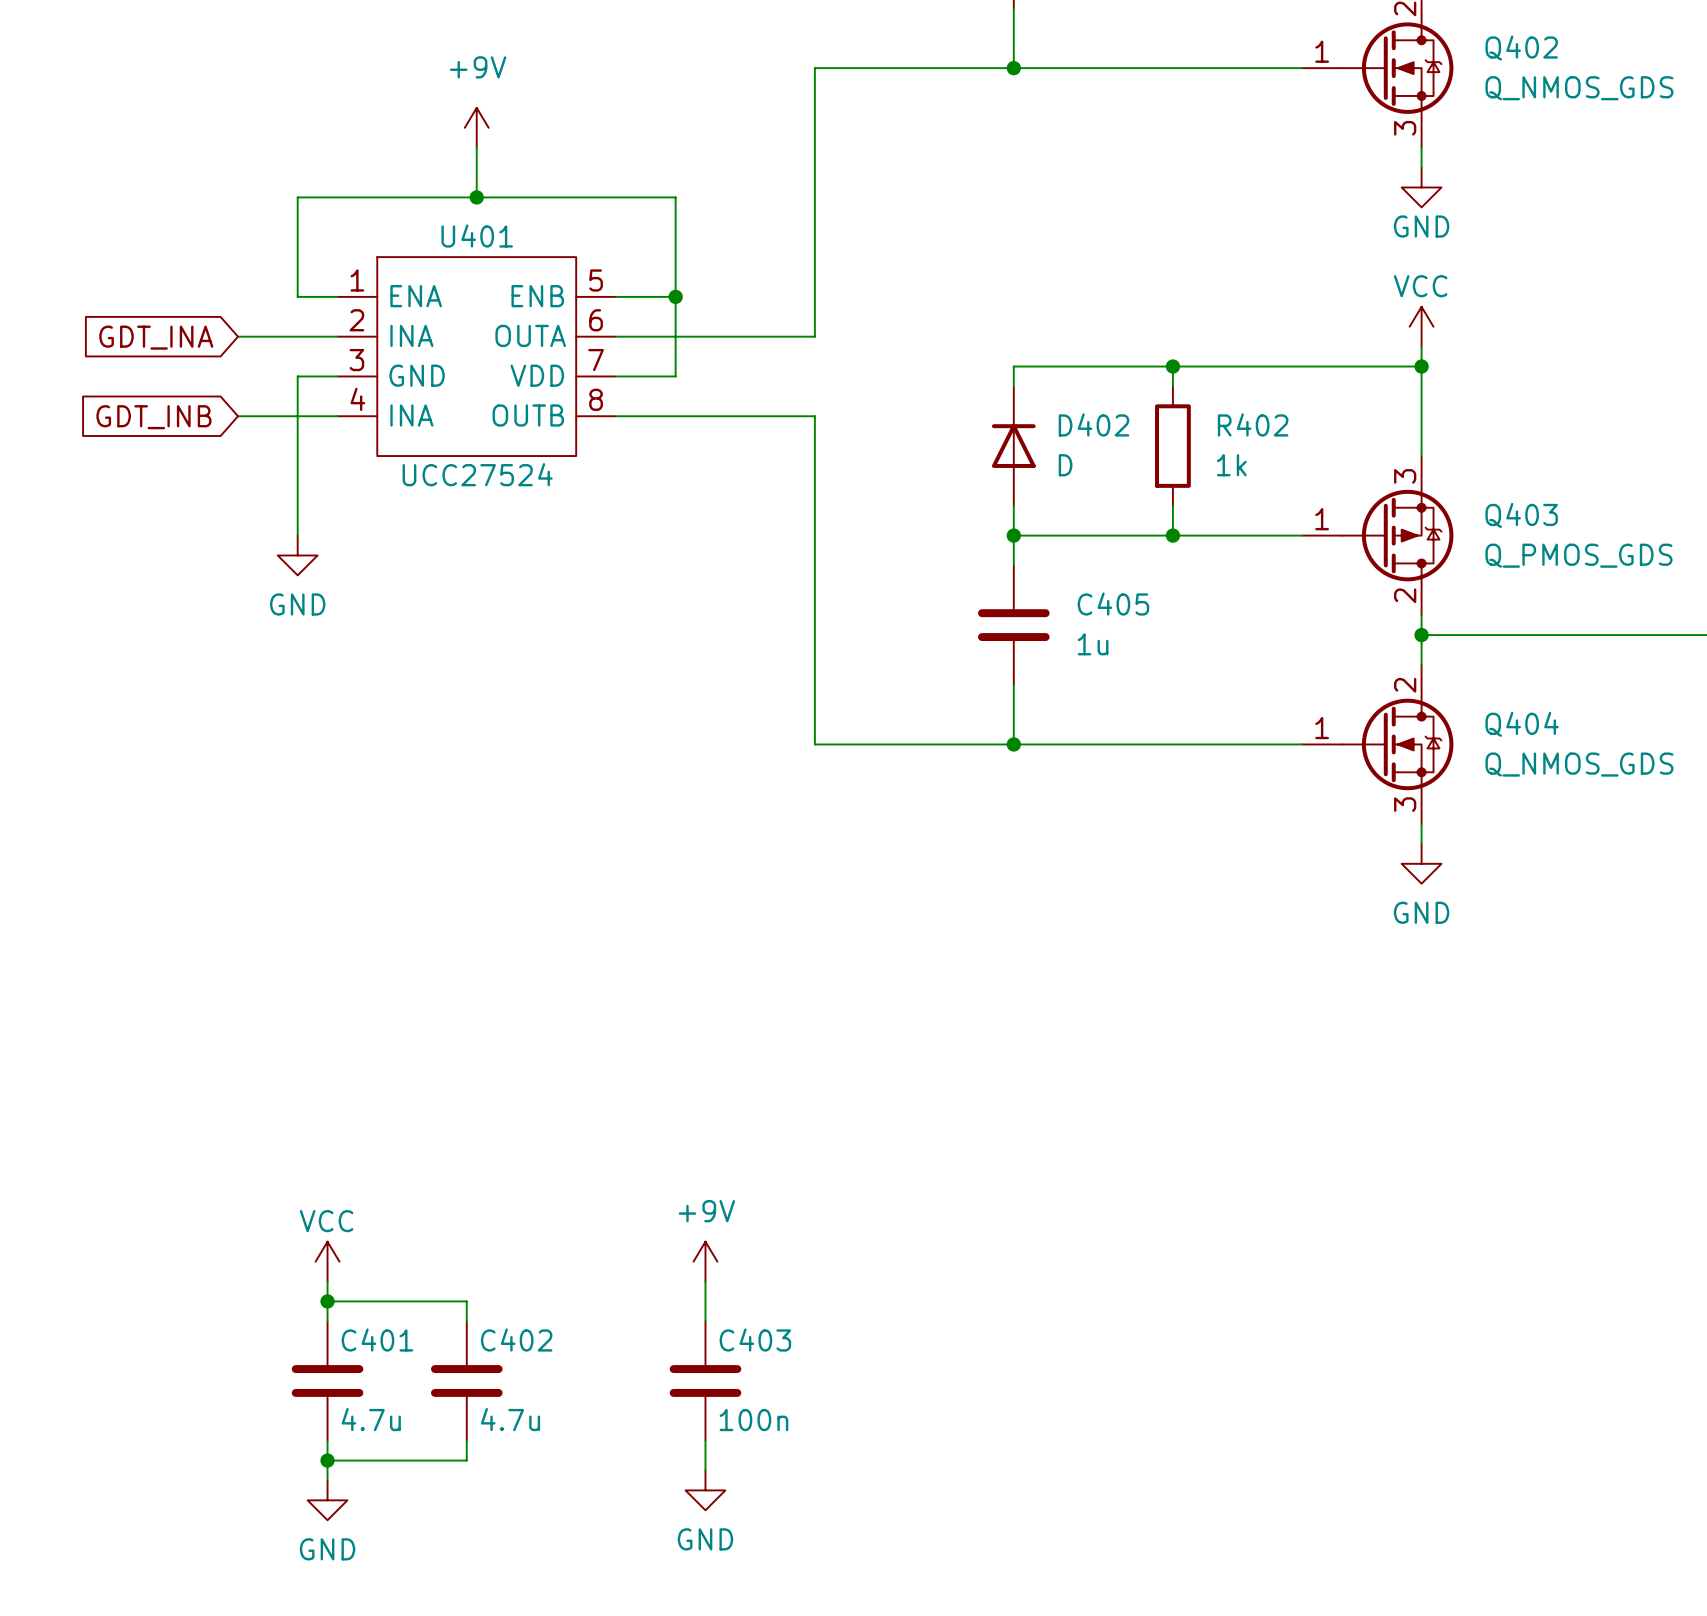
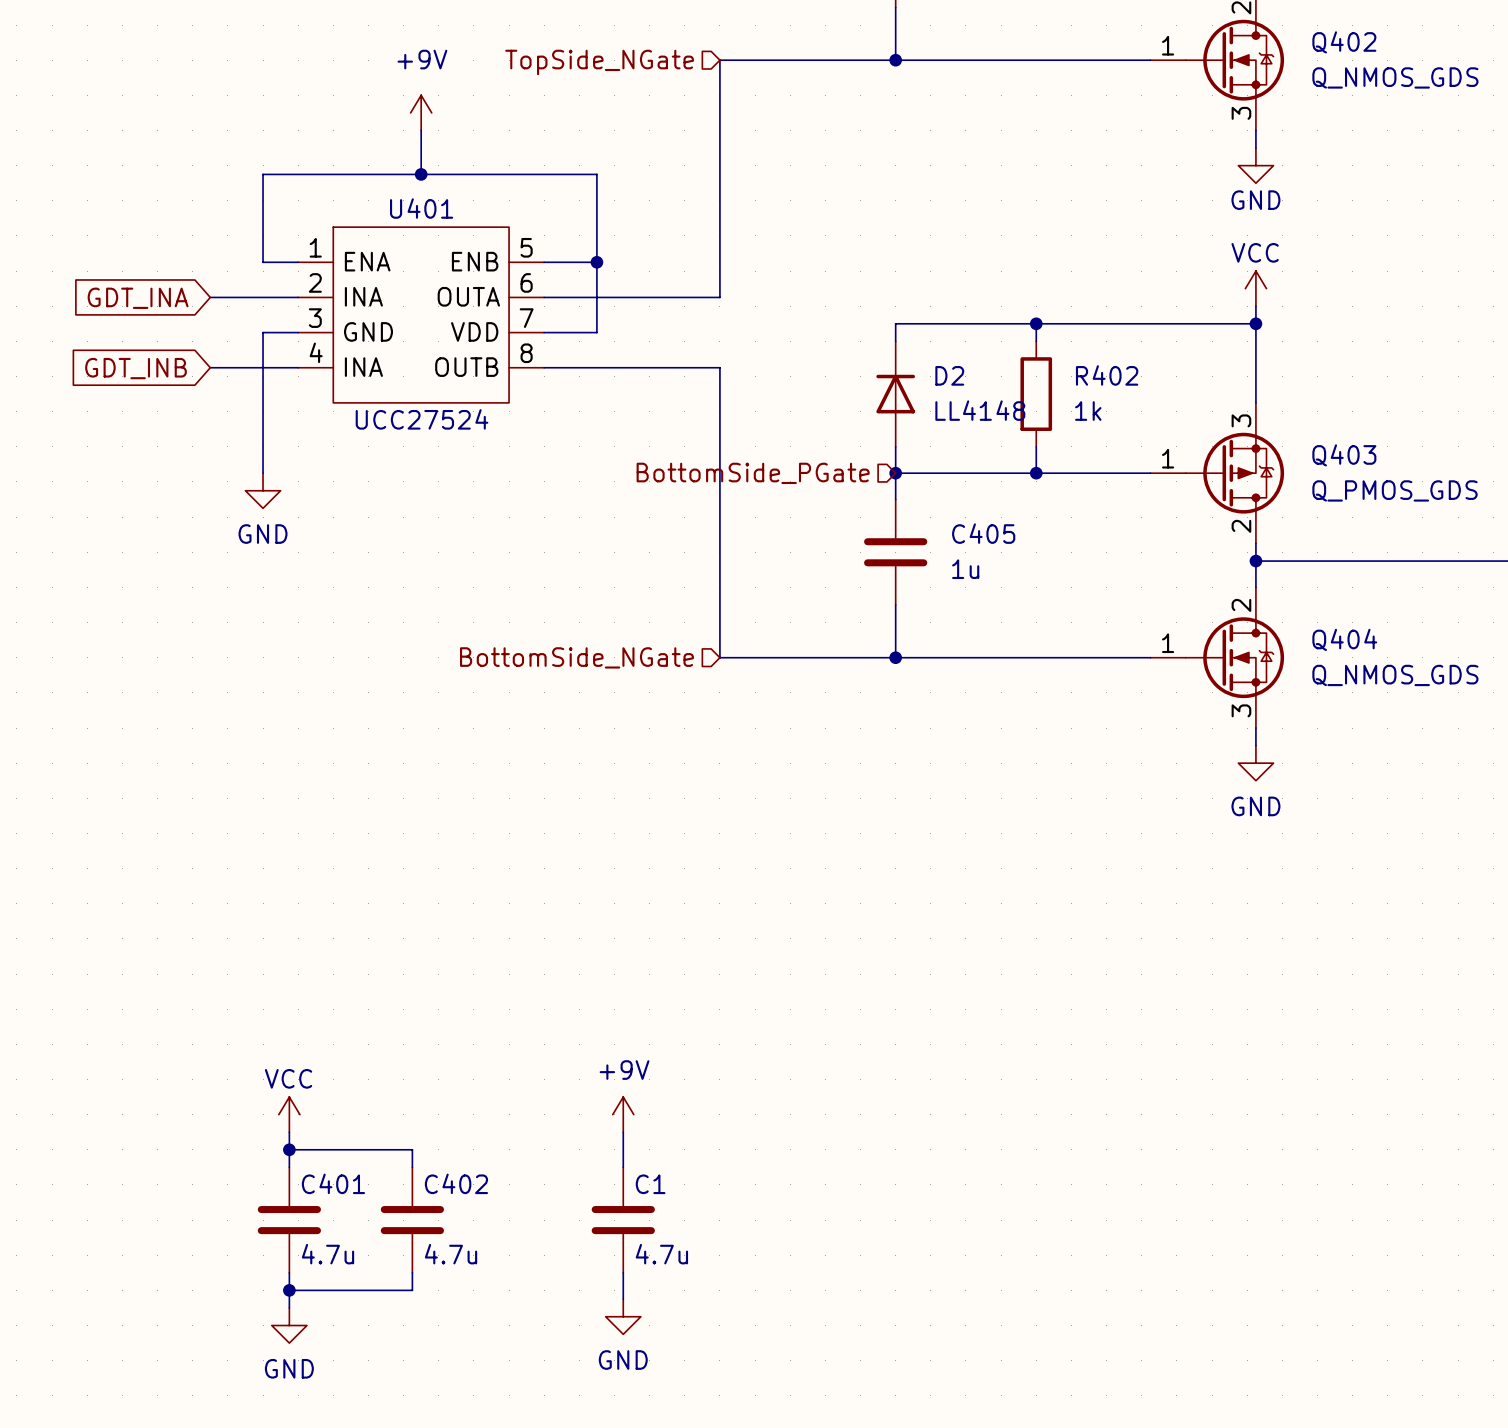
hierarchical label: none -> TopSide_NGate (599, 62)
D402 name: D402 (1093, 424) -> D2 (949, 375)
D402 value: D (1065, 465) -> LL4148 (980, 410)
hierarchical label: none -> BottomSide_PGate (753, 473)
hierarchical label: none -> BottomSide_NGate (576, 657)
C403 name: C403 (755, 1339) -> C1 (650, 1184)
C403 value: 100n (753, 1420) -> 4.7u (661, 1254)

